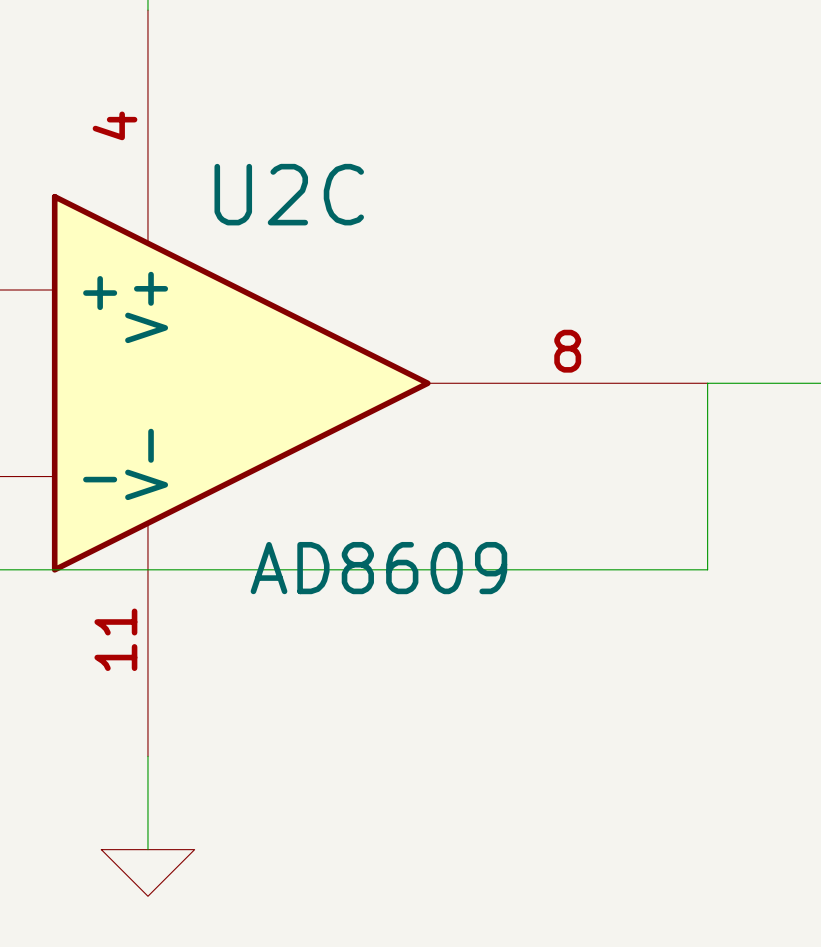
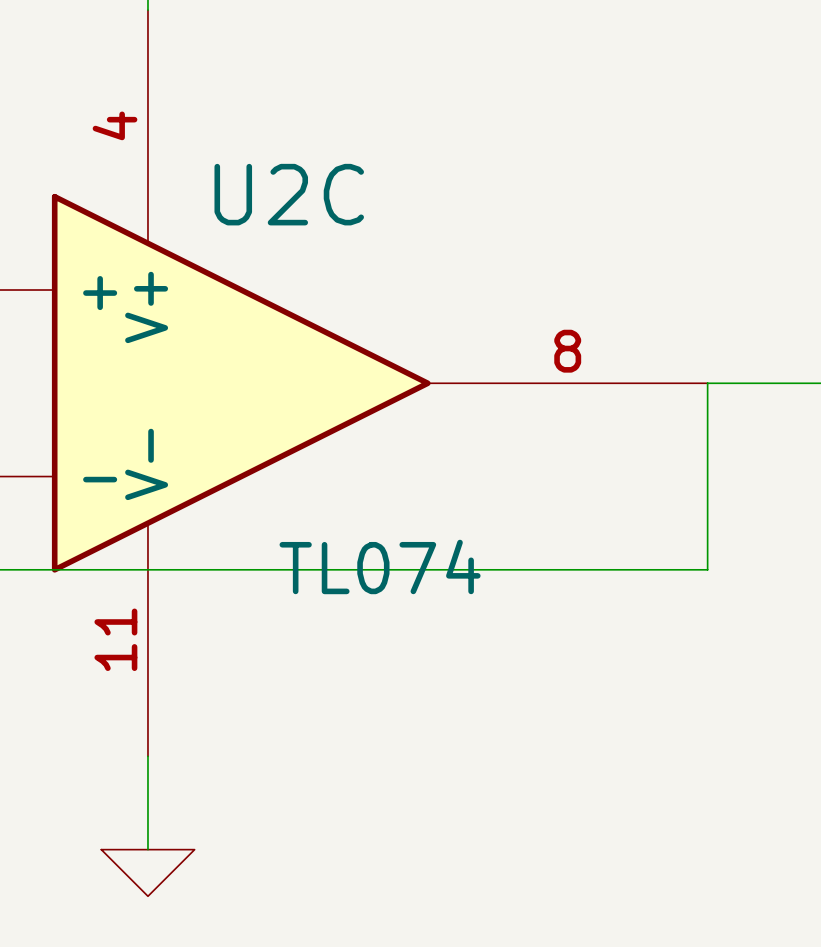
U2C value: AD8609 (378, 568) -> TL074 (380, 566)

